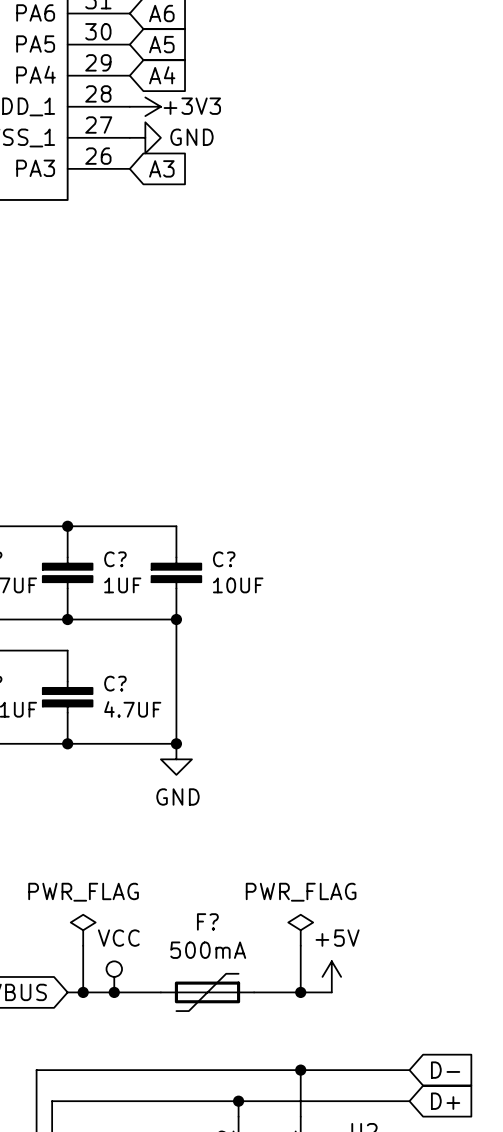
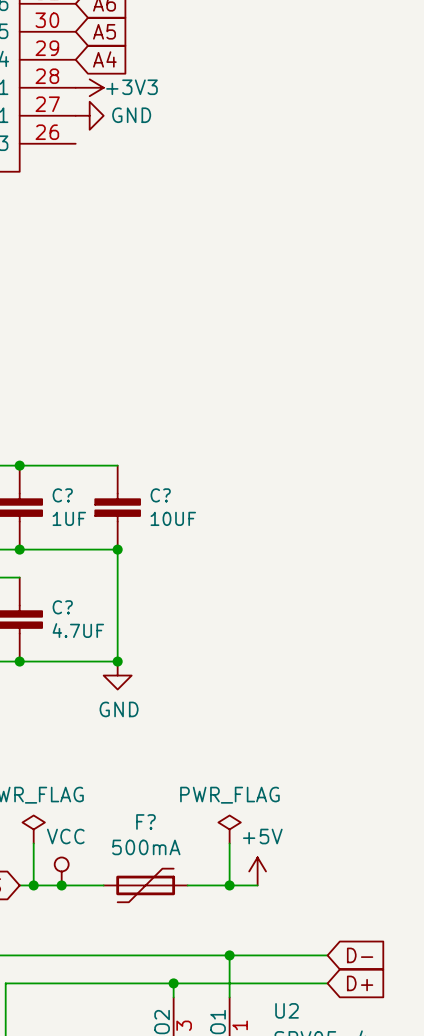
global label: A3 (161, 168) -> none

